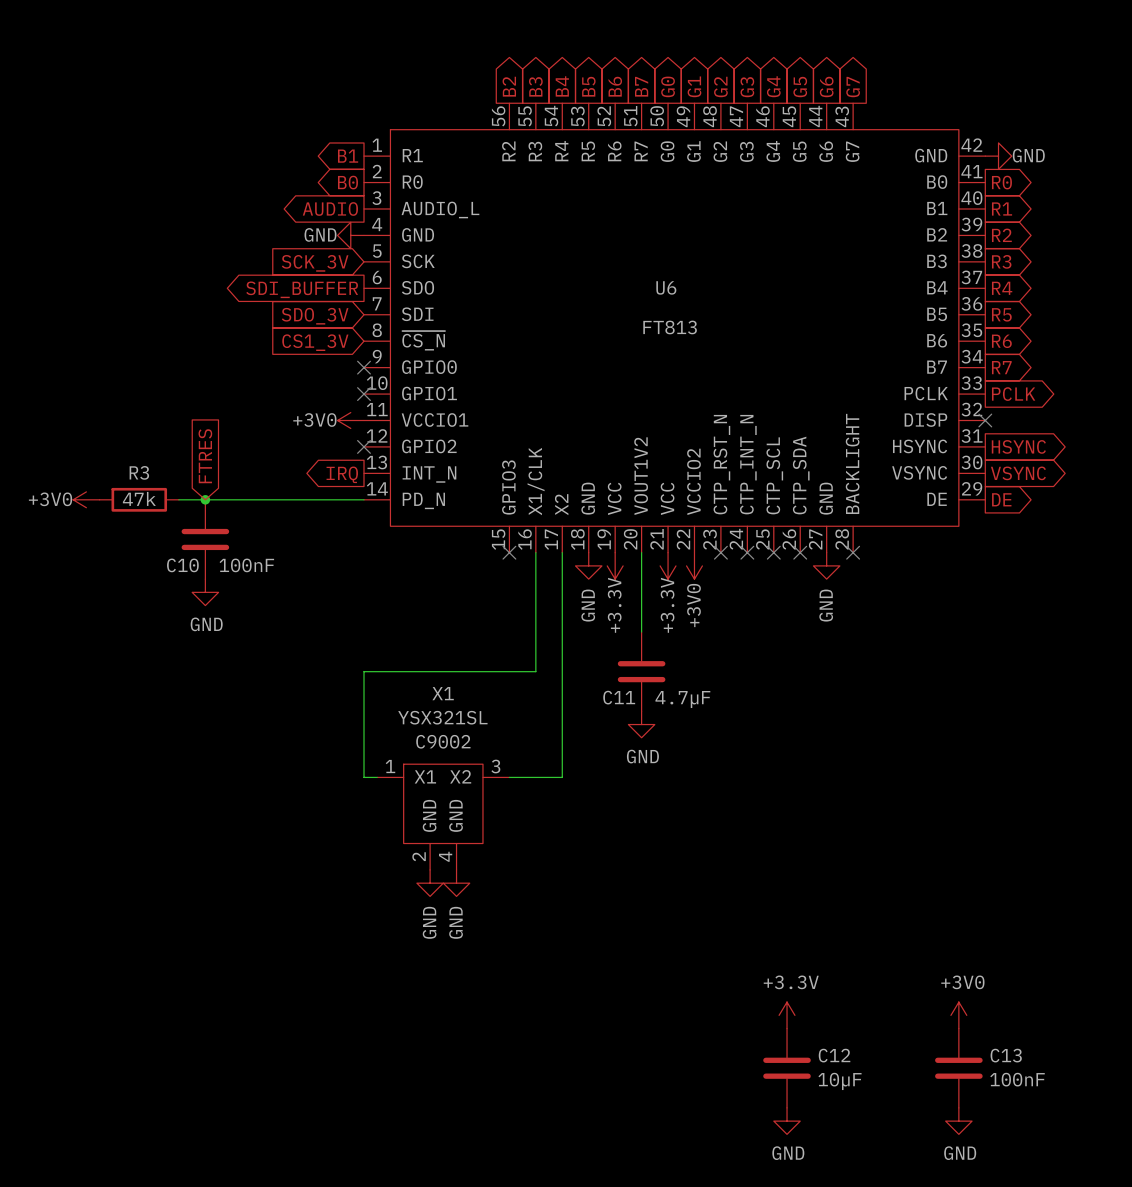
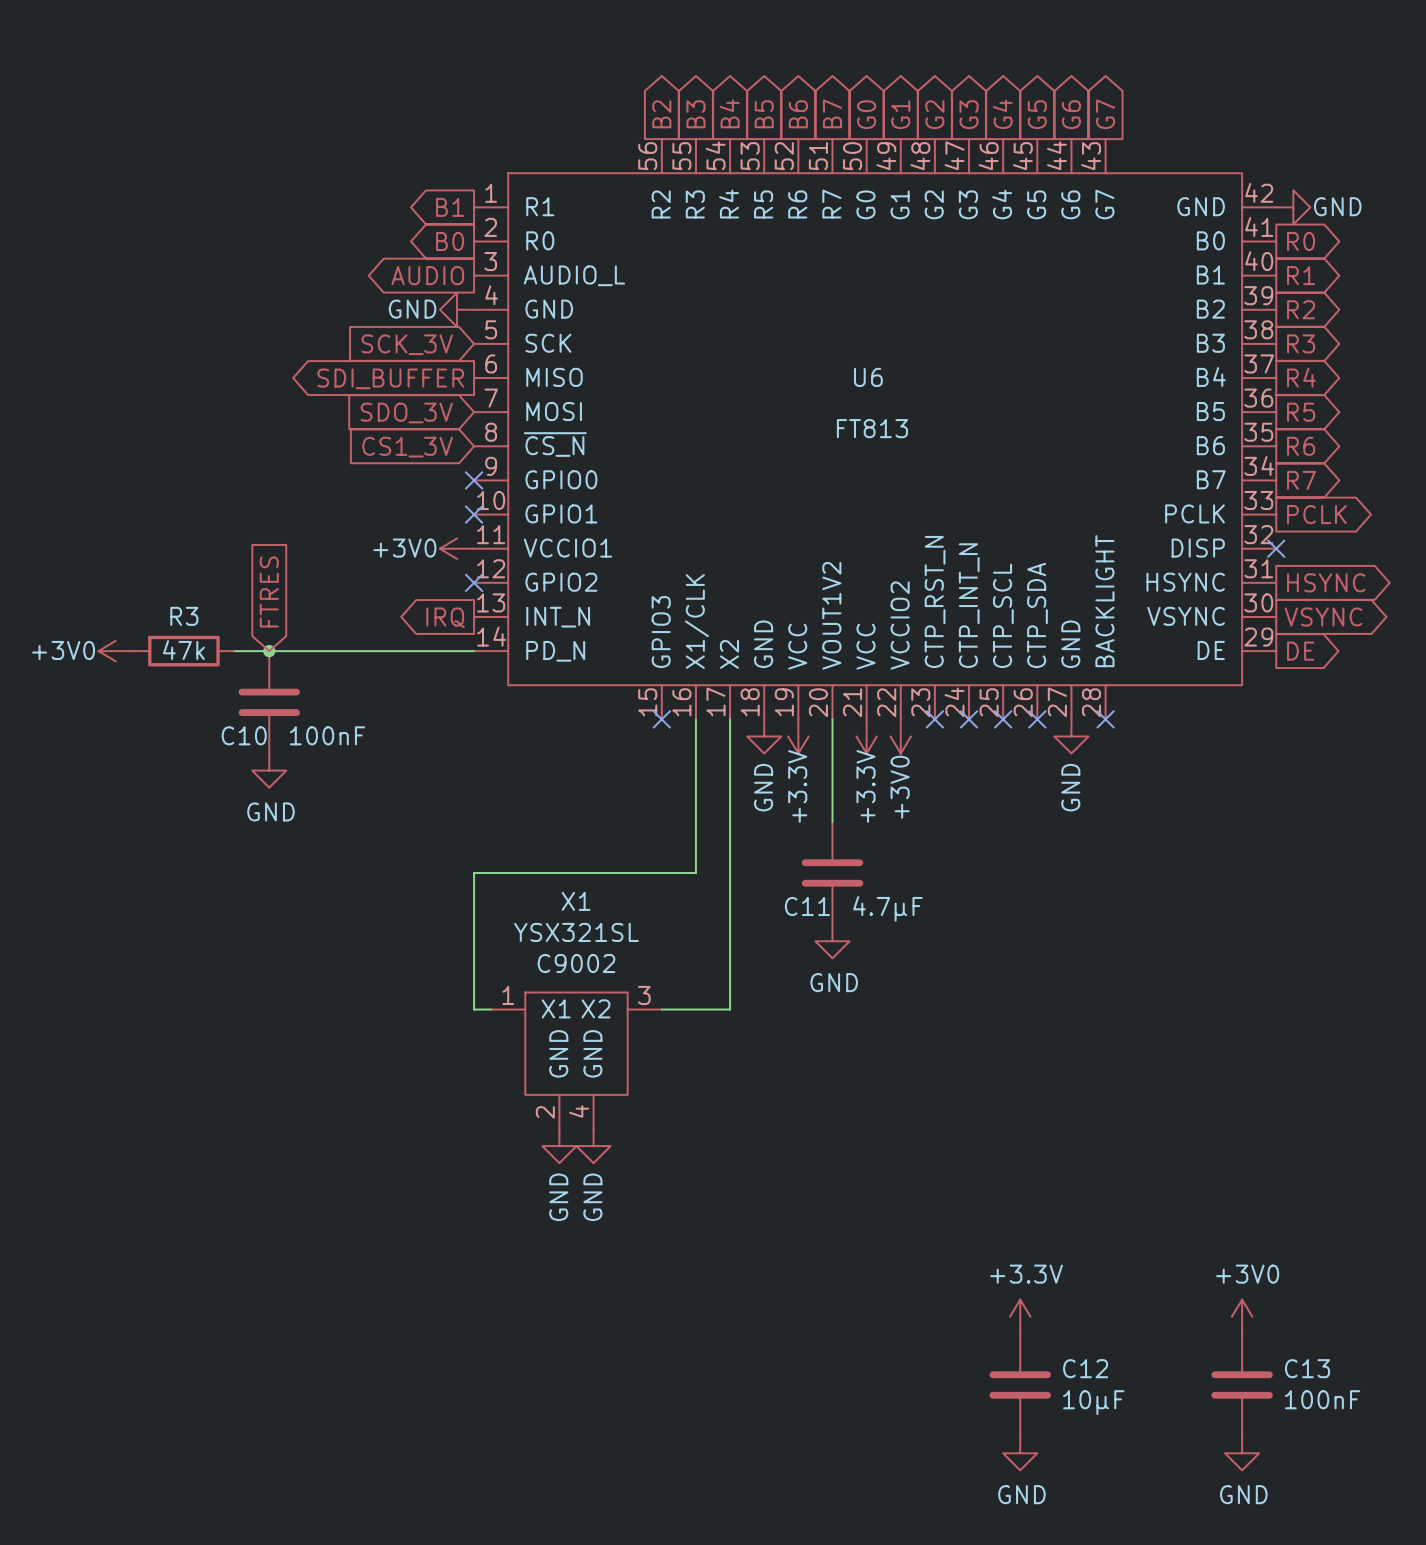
U6 pin name: SDO (417, 287) -> MISO (554, 377)
U6 pin name: SDI (417, 314) -> MOSI (554, 411)

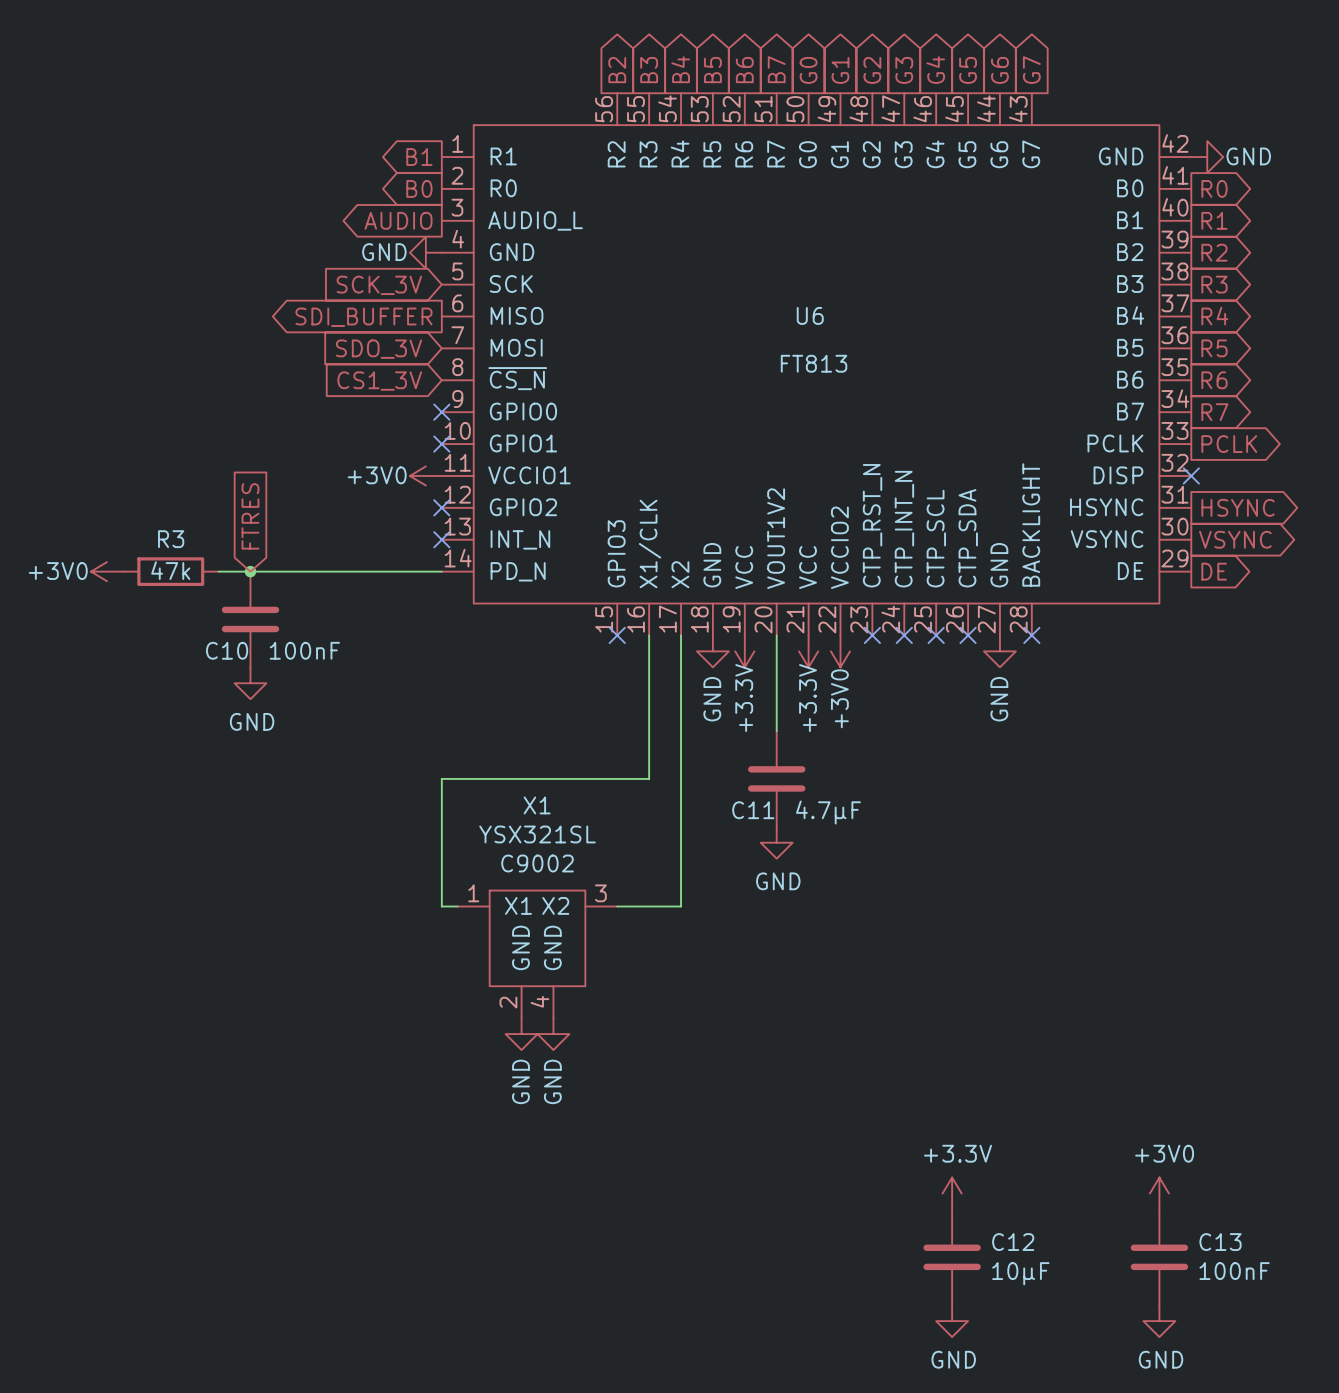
no-connect mark: none -> (441, 539)
global label: IRQ (445, 617) -> none

